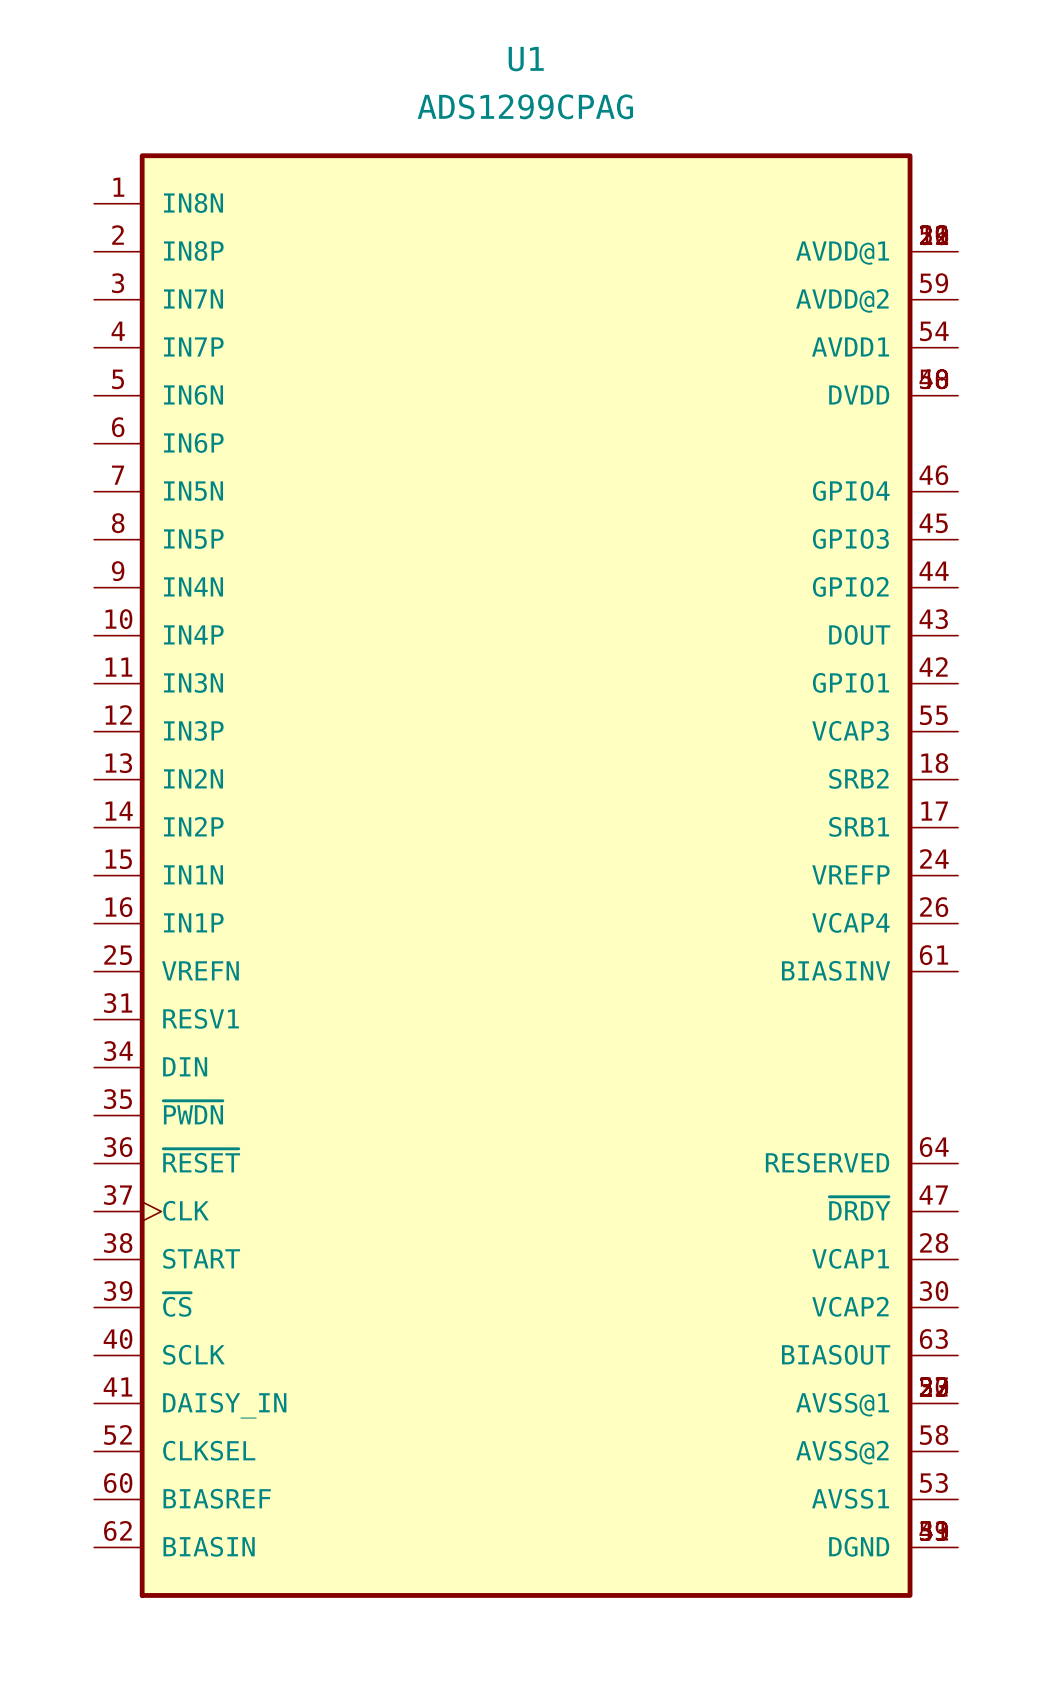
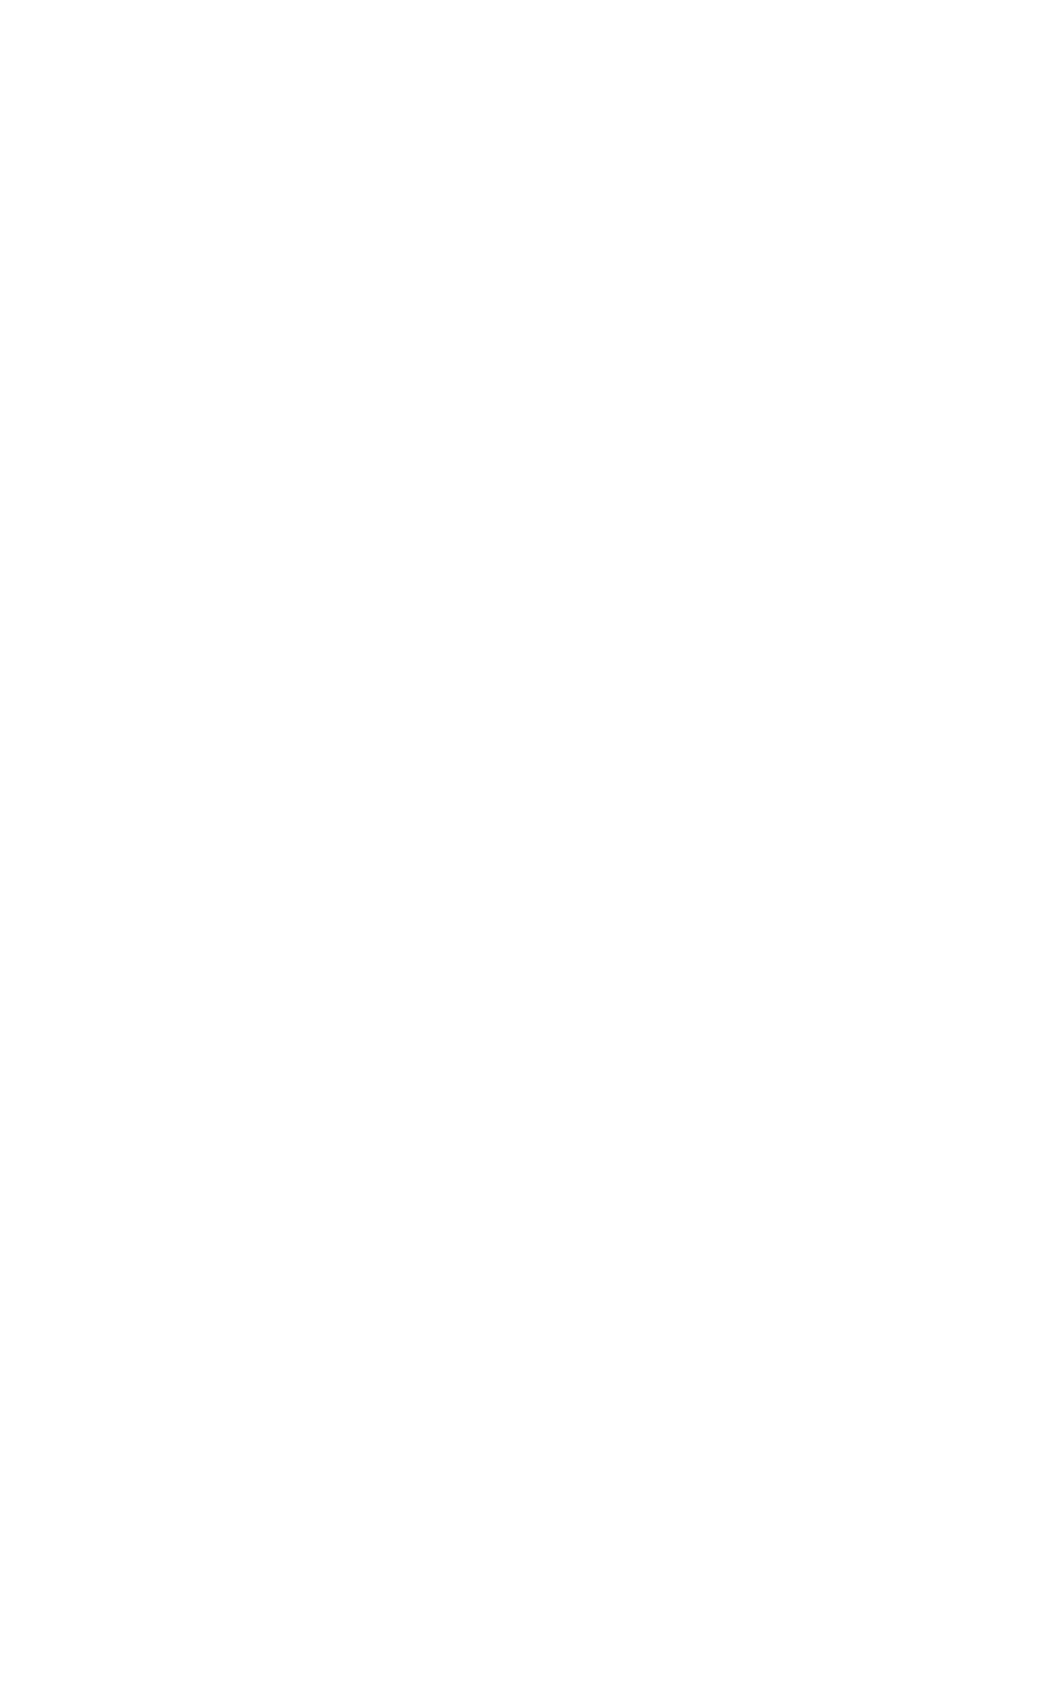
U1: ADS1299CPAG (526, 875) -> none

